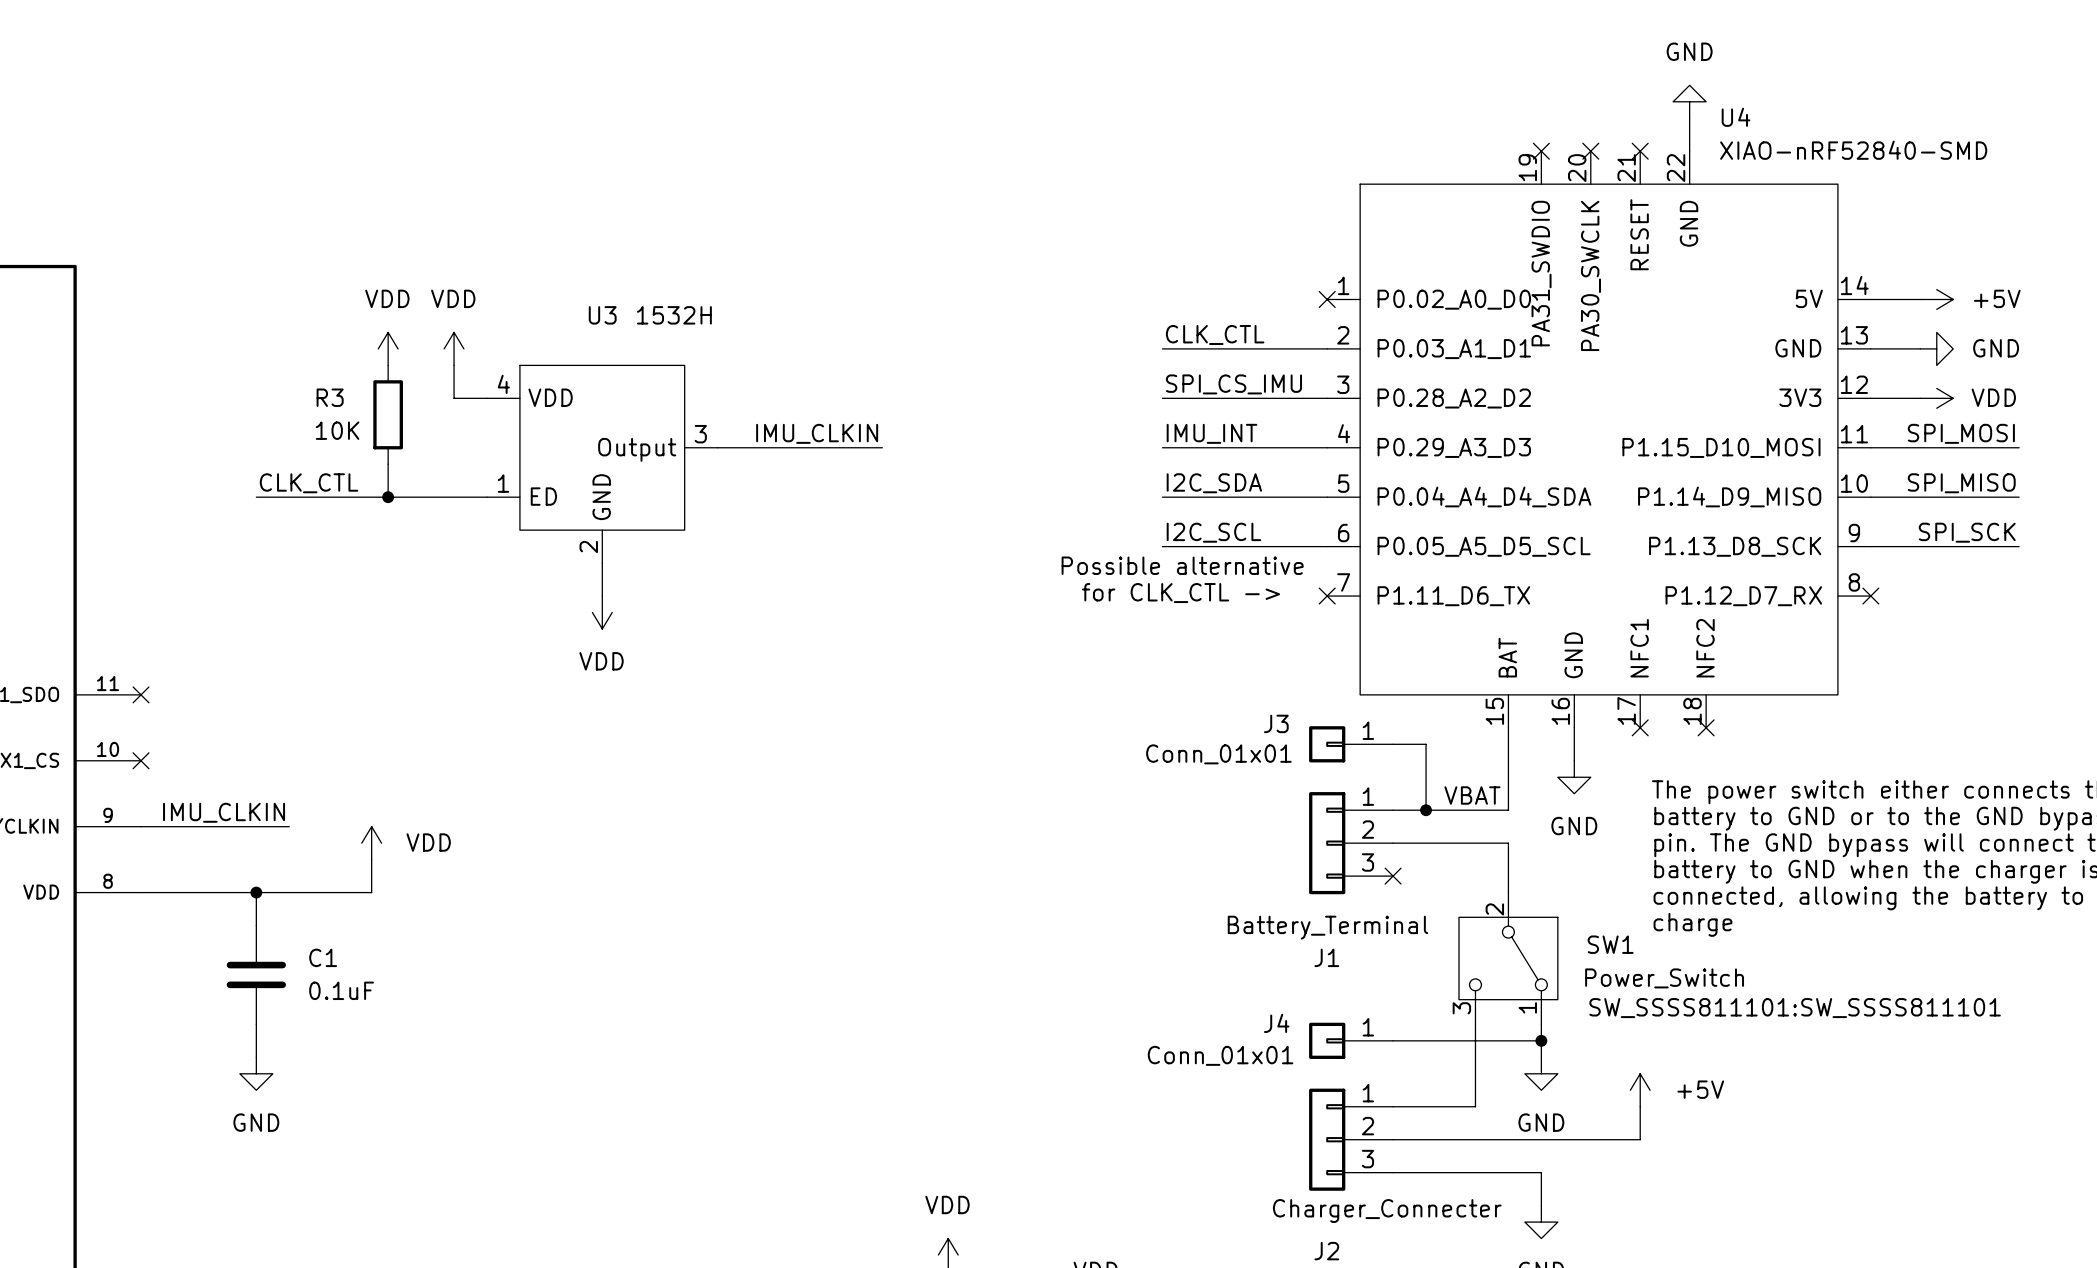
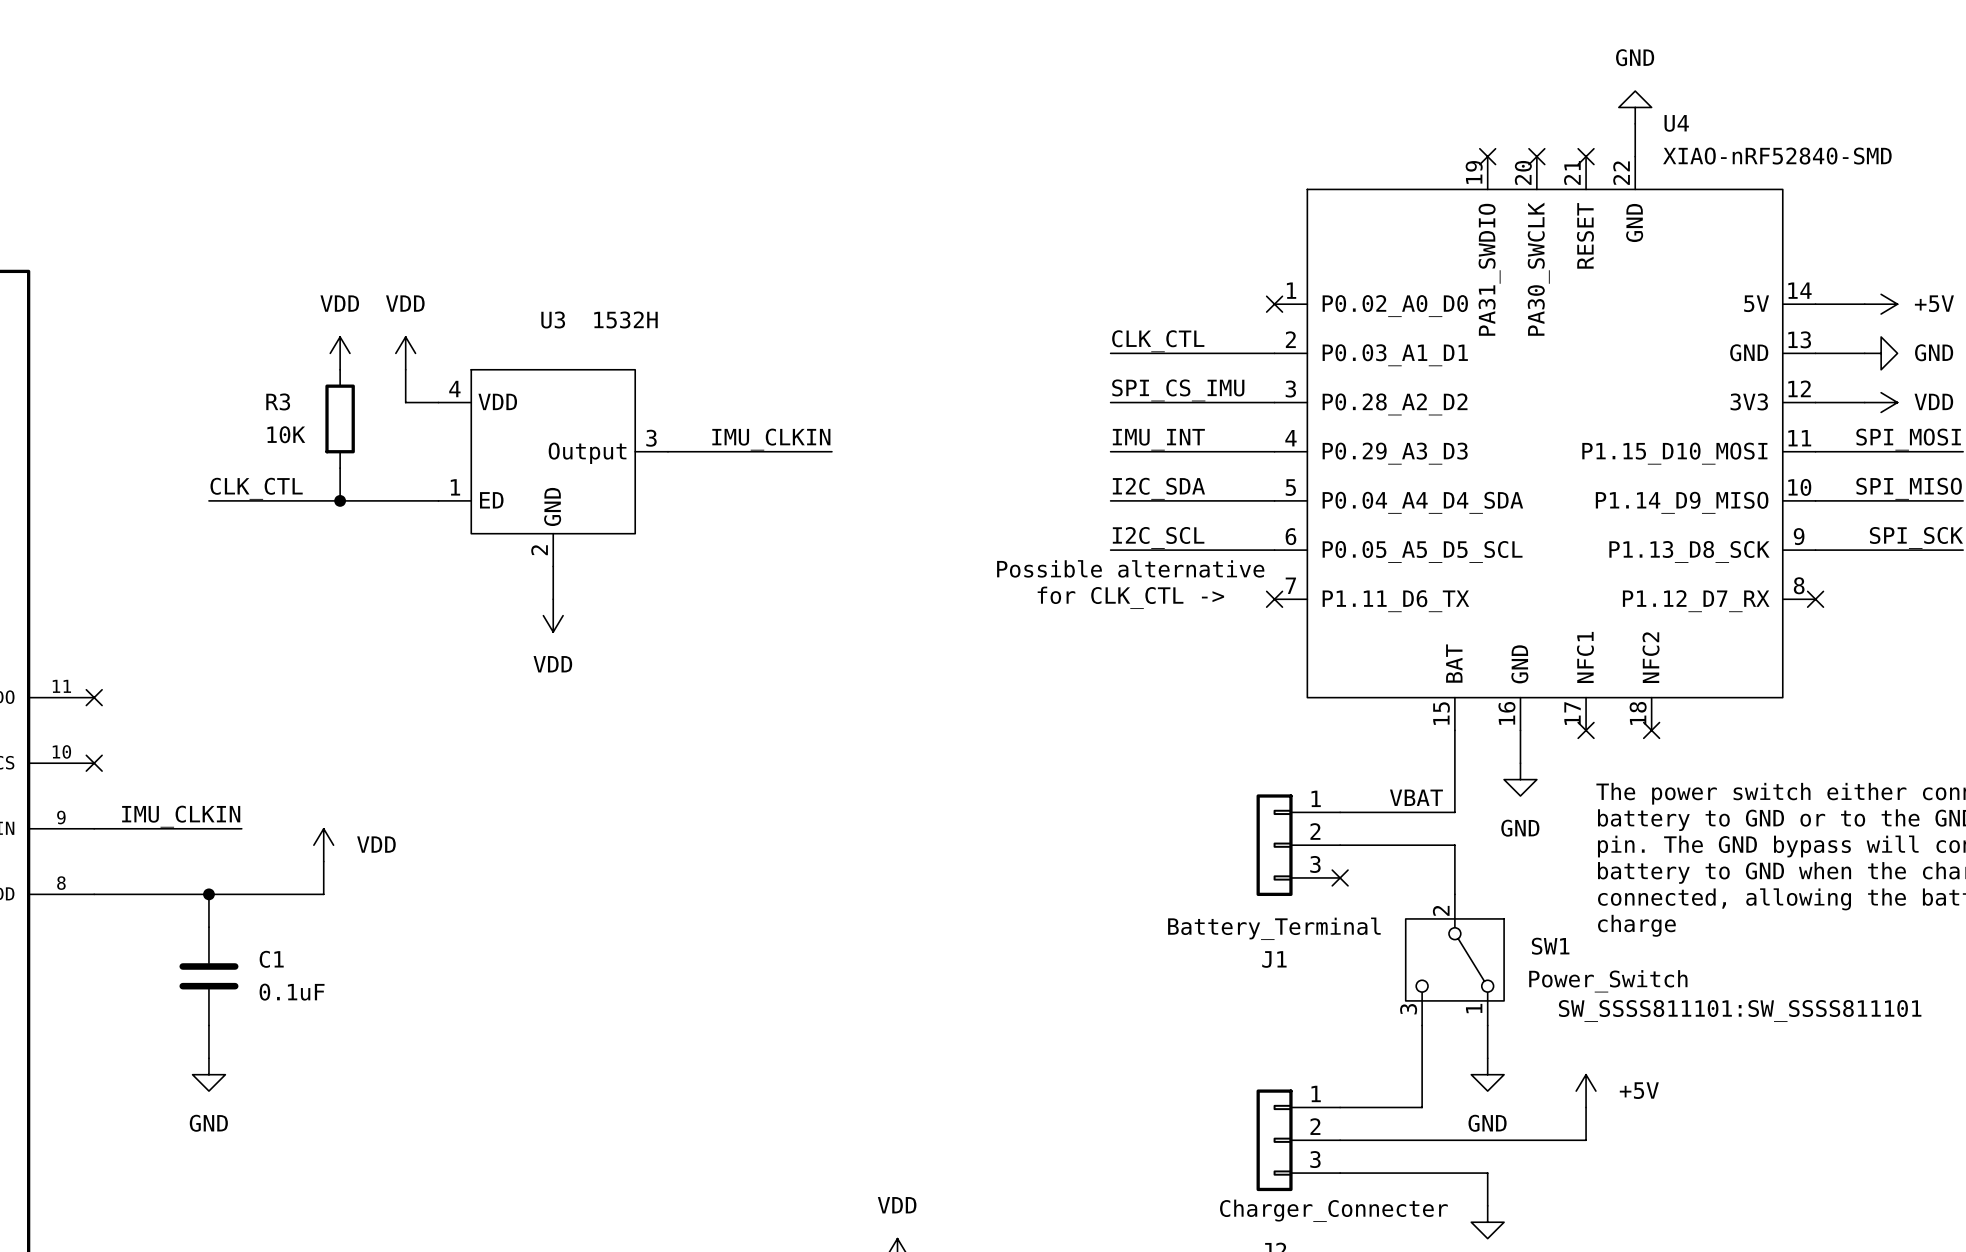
J3: Conn_01x01 (1351, 744) -> none
wire: (1393, 744) (1426, 744) (1426, 810) -> none
junction: (1426, 810) -> none
J4: Conn_01x01 (1351, 1040) -> none
wire: (1393, 1040) (1541, 1040) -> none
junction: (1541, 1040) -> none

